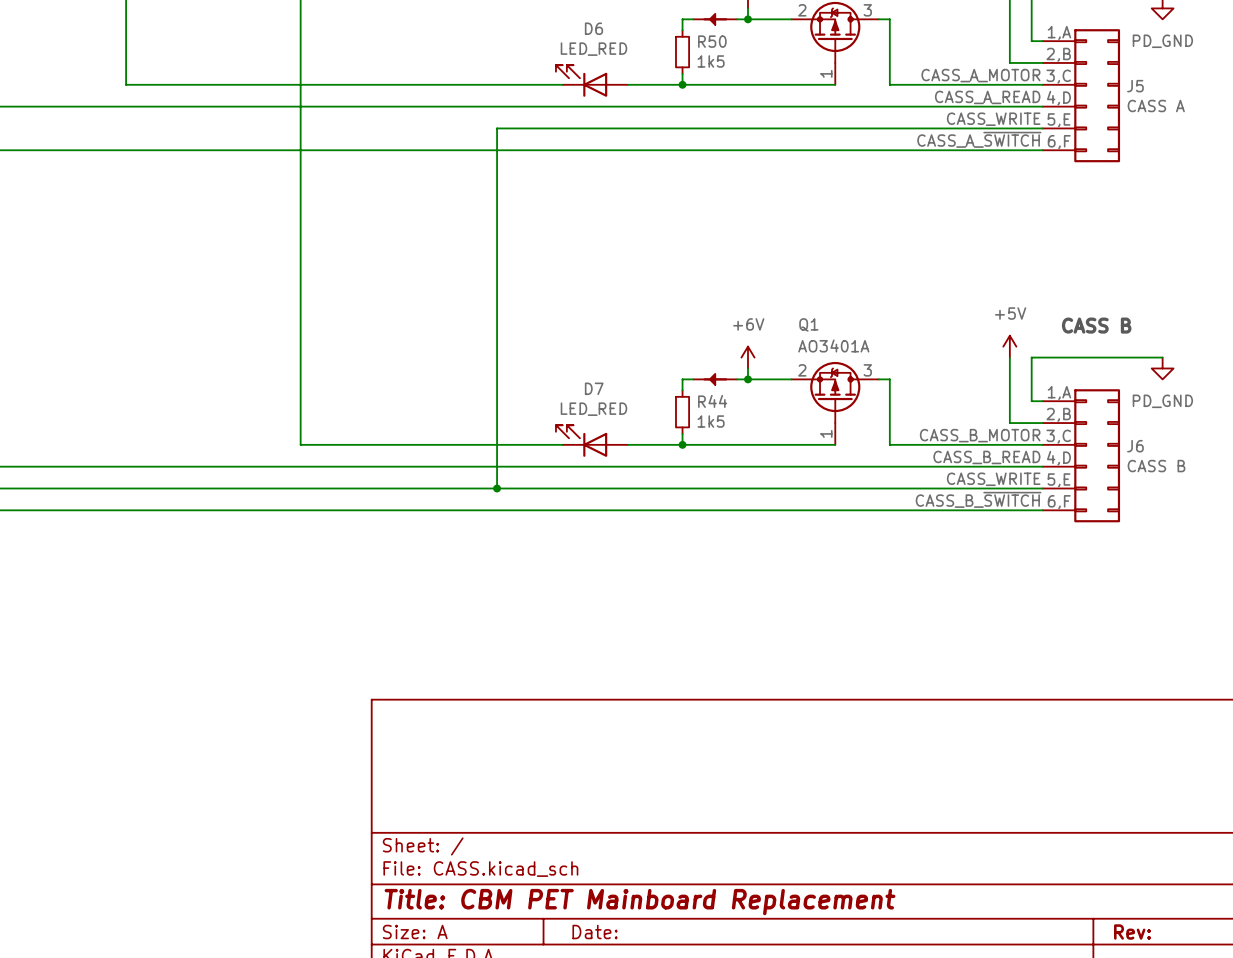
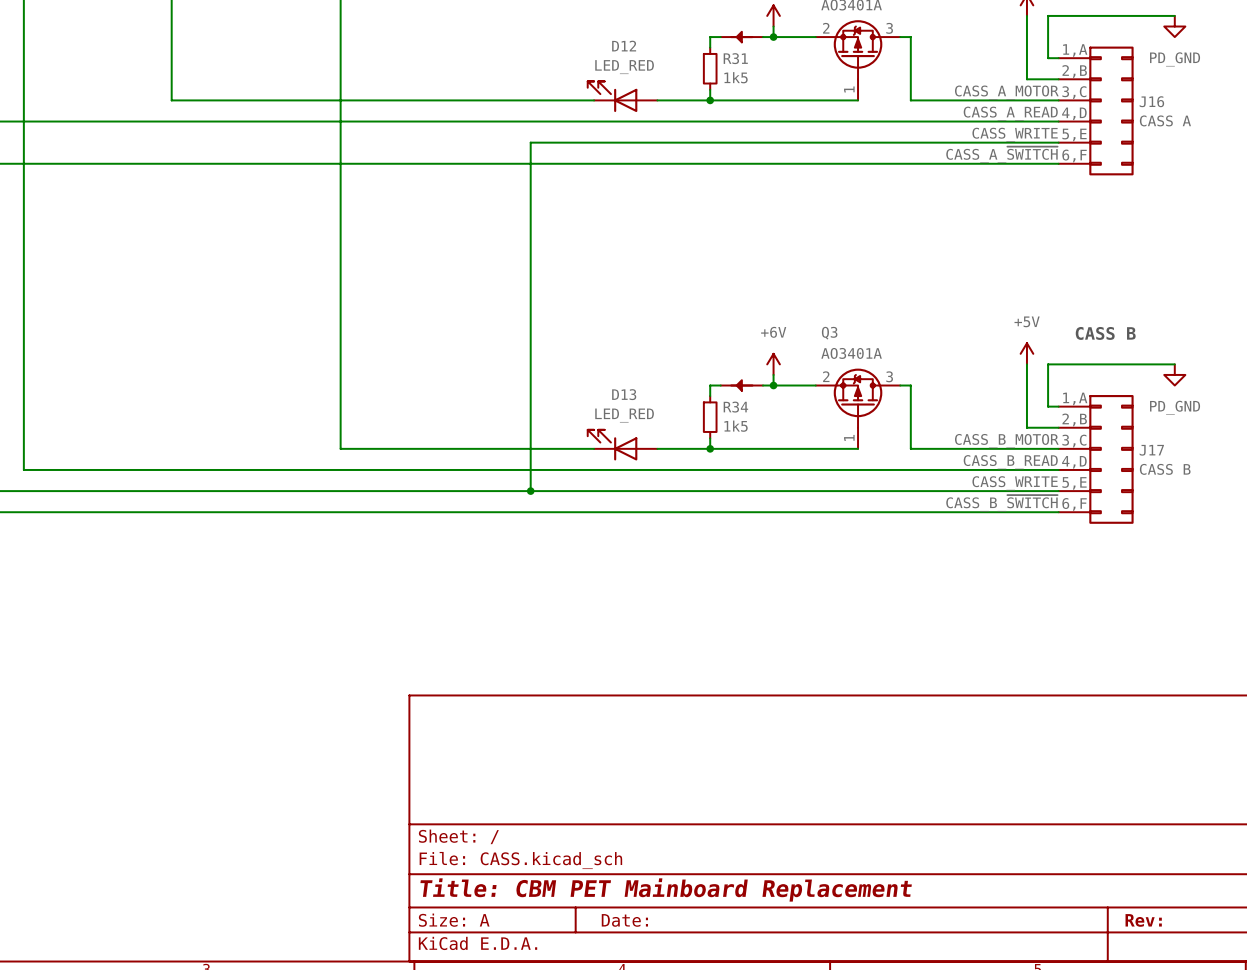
D6 name: D6 (593, 28) -> D12 (624, 46)
R50 name: R50 (712, 41) -> R31 (735, 58)
J5 name: J5 (1135, 86) -> J16 (1151, 101)
Q1 name: Q1 (808, 324) -> Q3 (829, 333)
D7 name: D7 (594, 388) -> D13 (624, 394)
R44 name: R44 (712, 401) -> R34 (735, 407)
J6 name: J6 (1135, 446) -> J17 (1151, 450)

